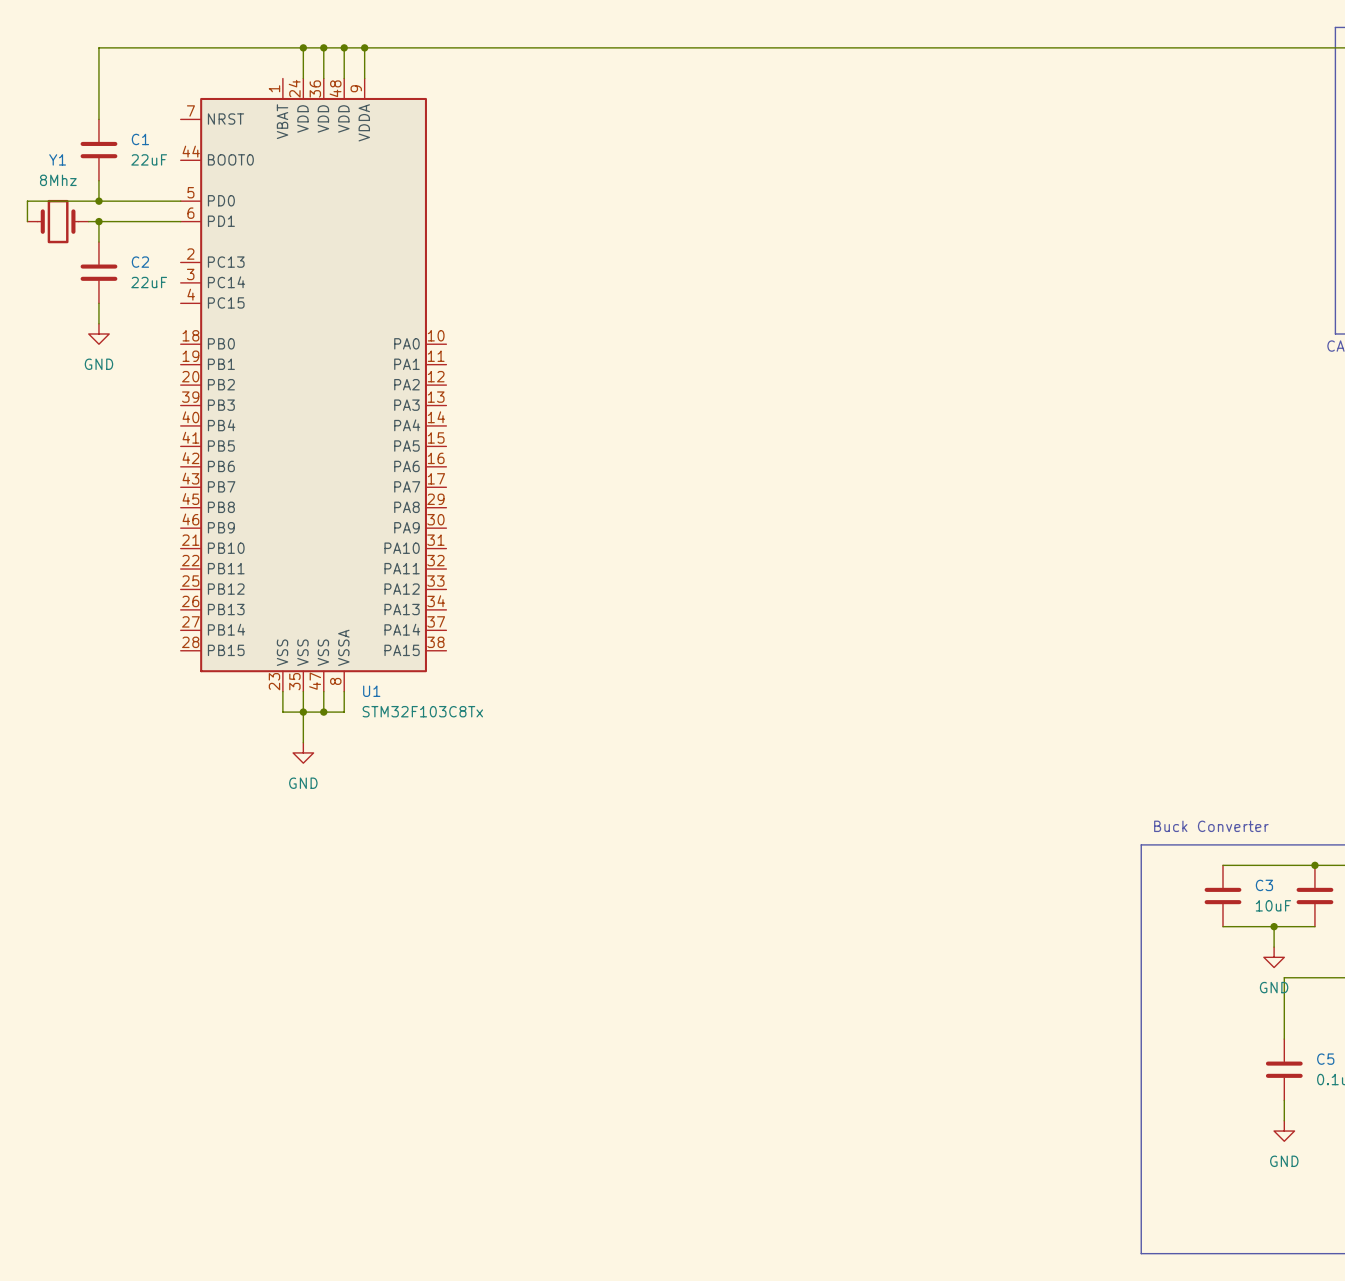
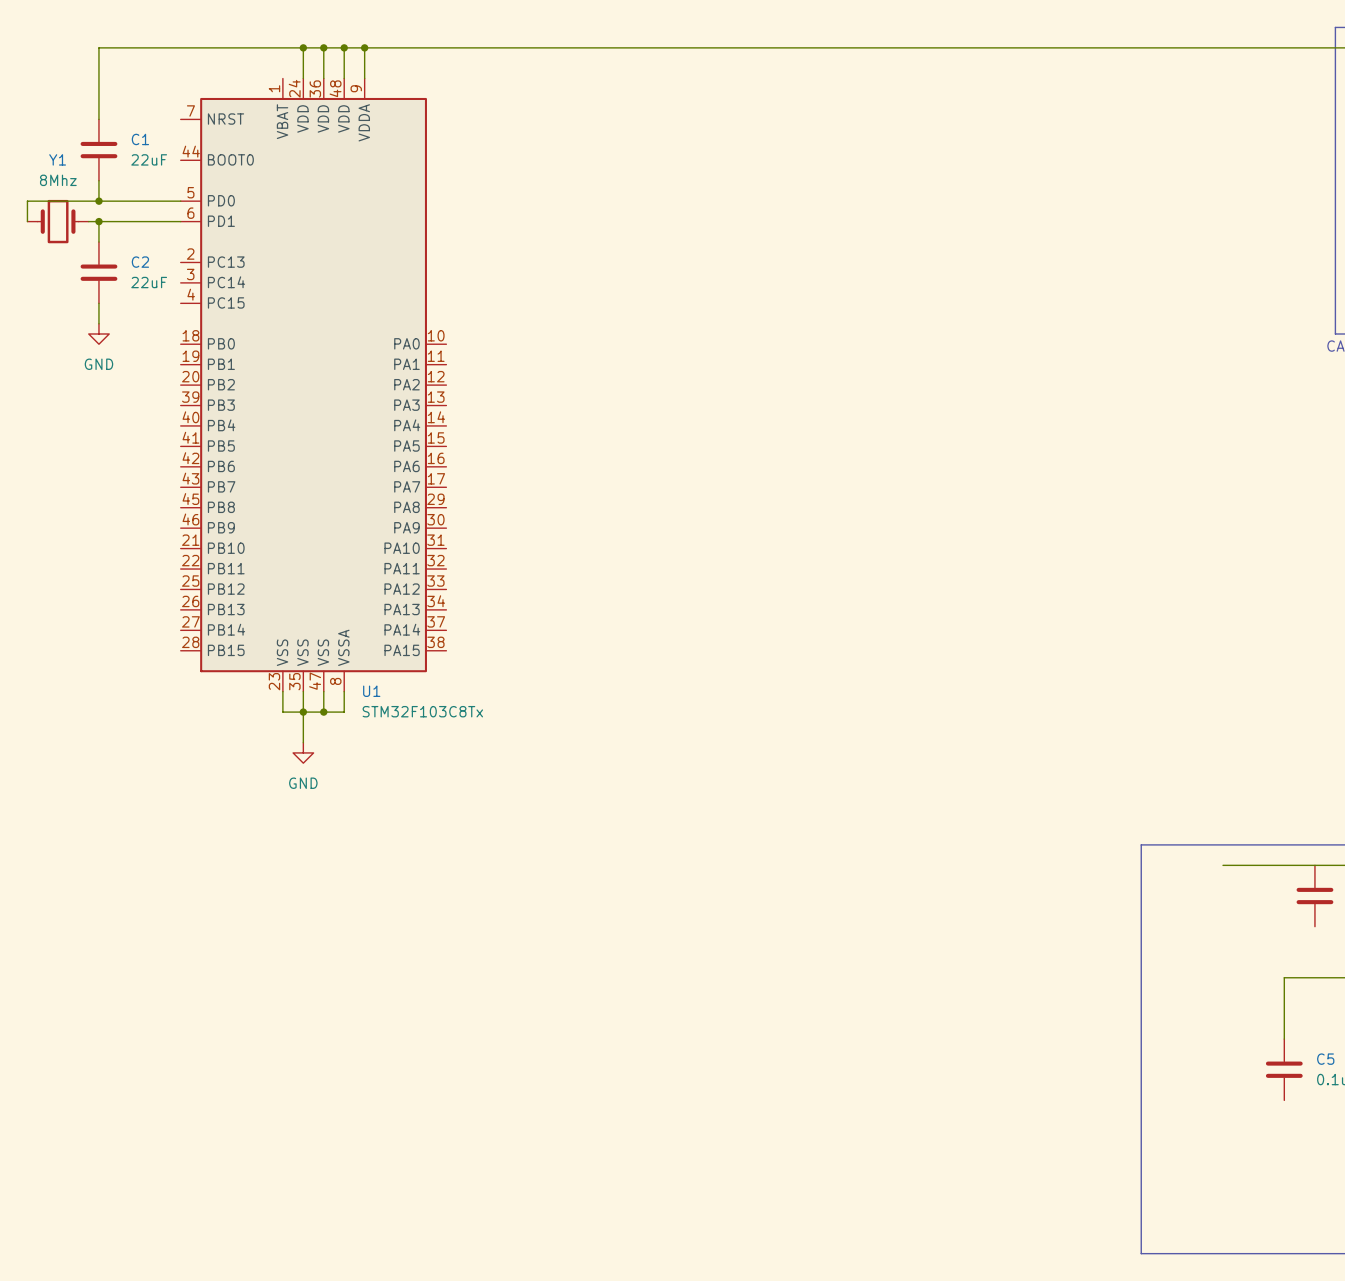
text: Buck Converter (1211, 826) -> none
junction: (1314, 865) -> none
C3: 10uF (1223, 896) -> none
wire: (1223, 926) (1314, 926) -> none
wire: (1274, 926) (1274, 947) -> none
junction: (1274, 926) -> none
power symbol: GND (1274, 957) -> none
wire: (1284, 1100) (1284, 1120) -> none
power symbol: GND (1284, 1131) -> none

